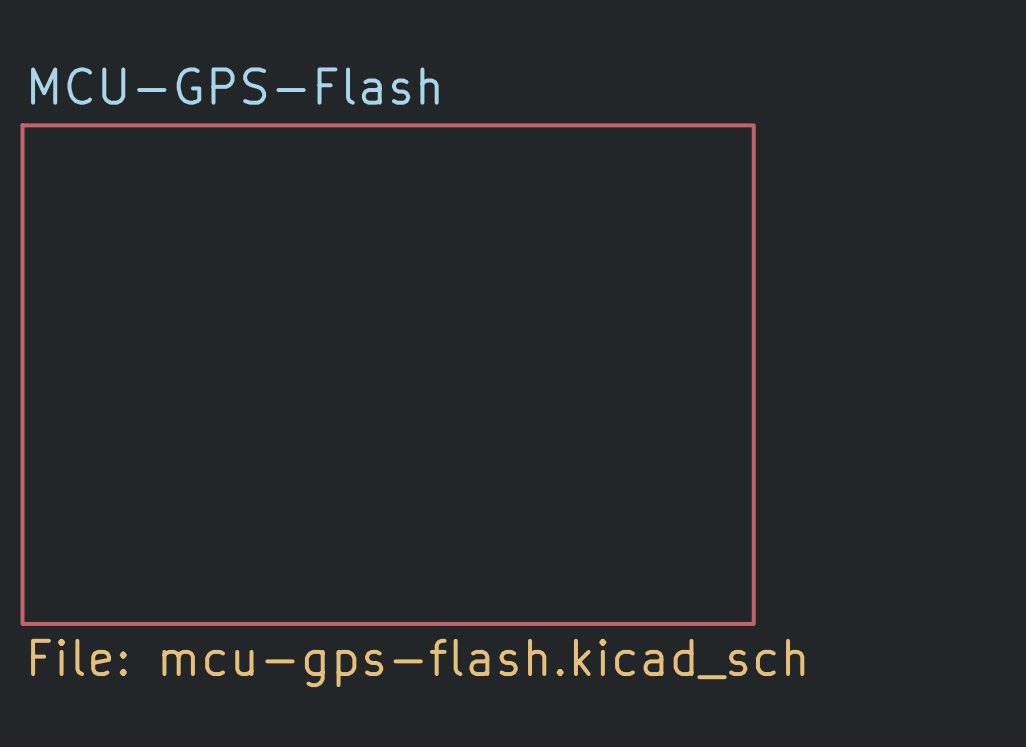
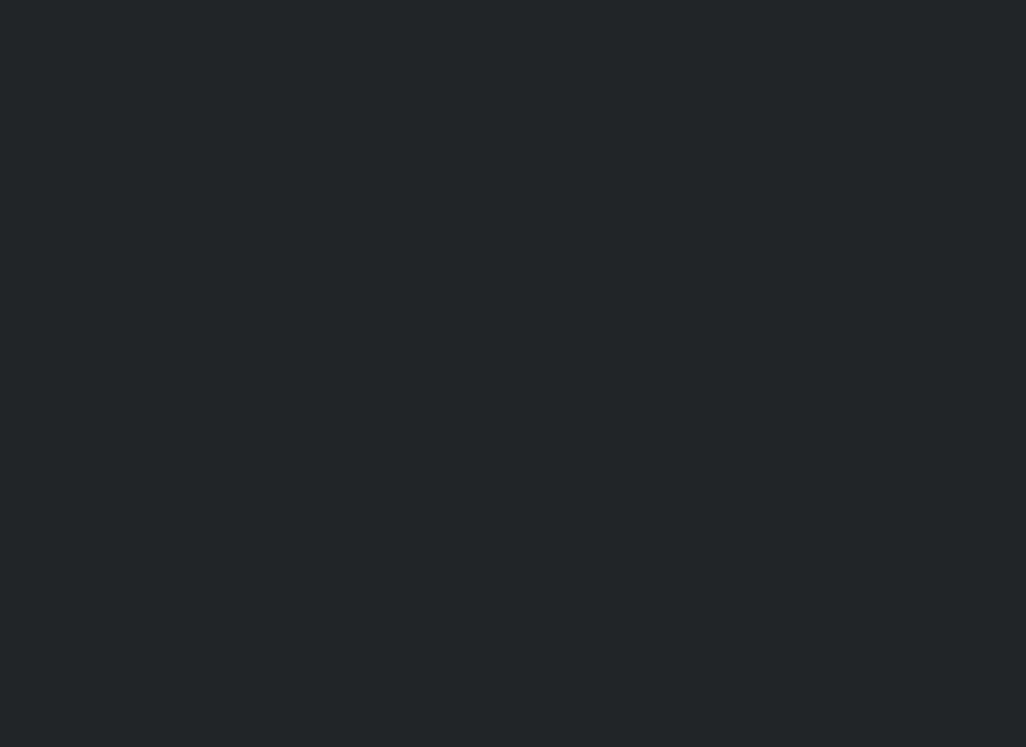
sheet MCU-GPS-Flash: File: mcu-gps-flash.kicad_sch (388, 374) -> none

